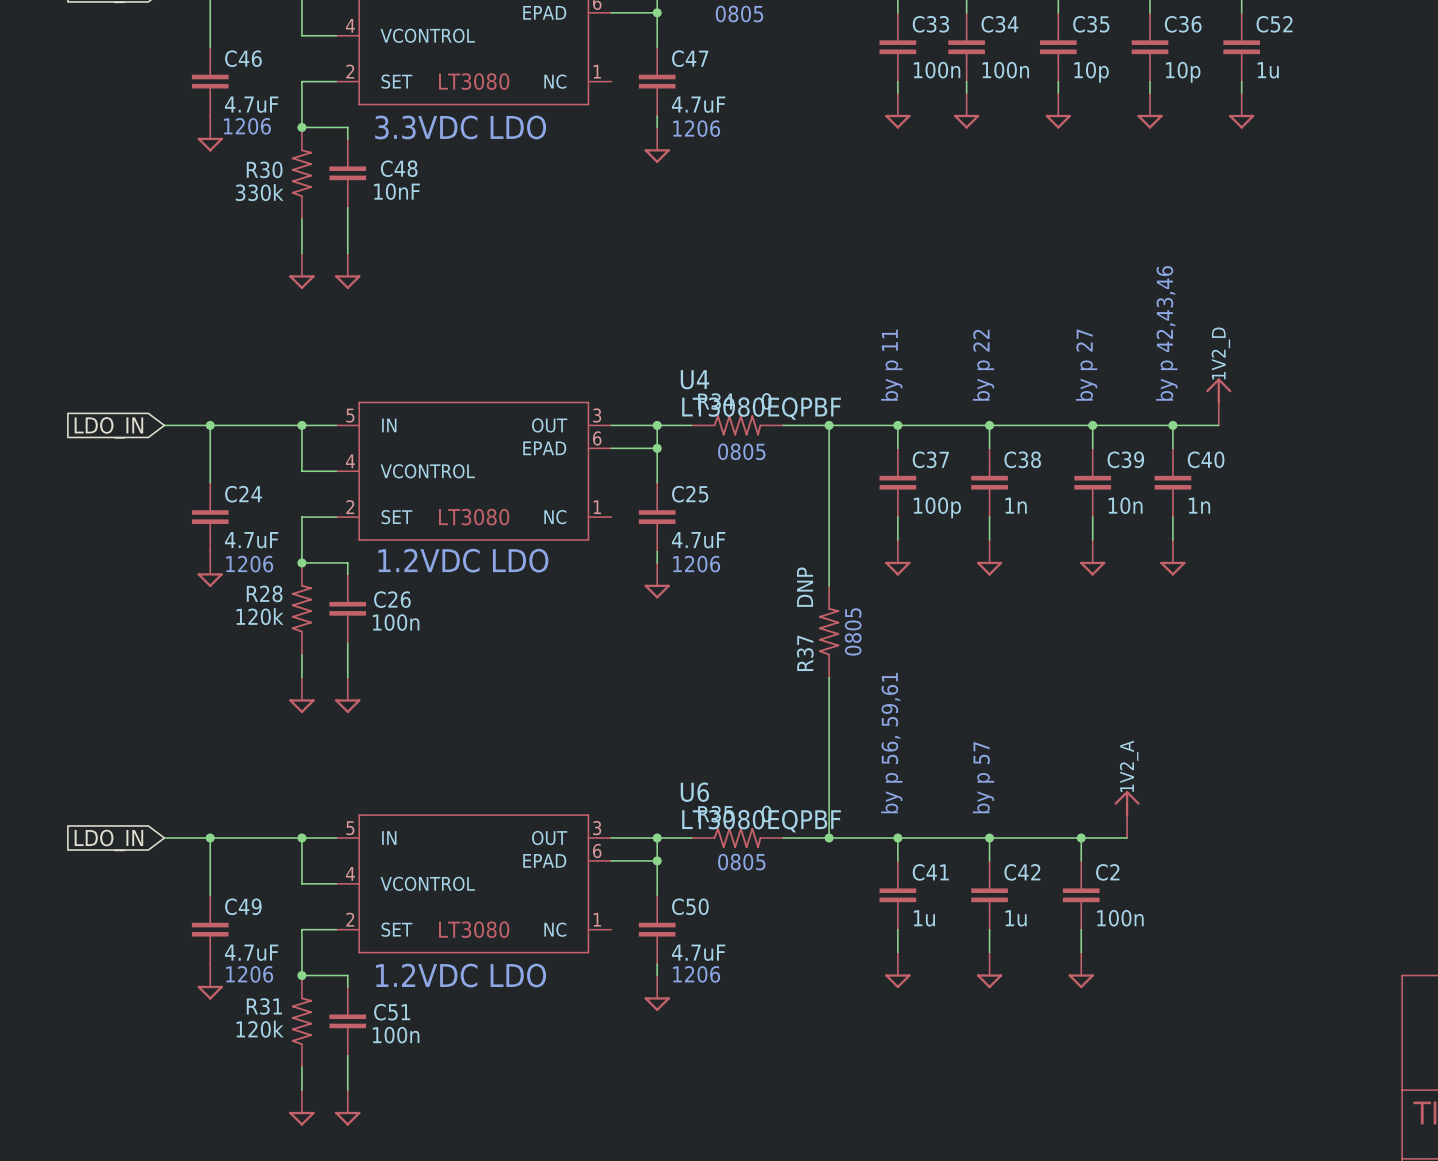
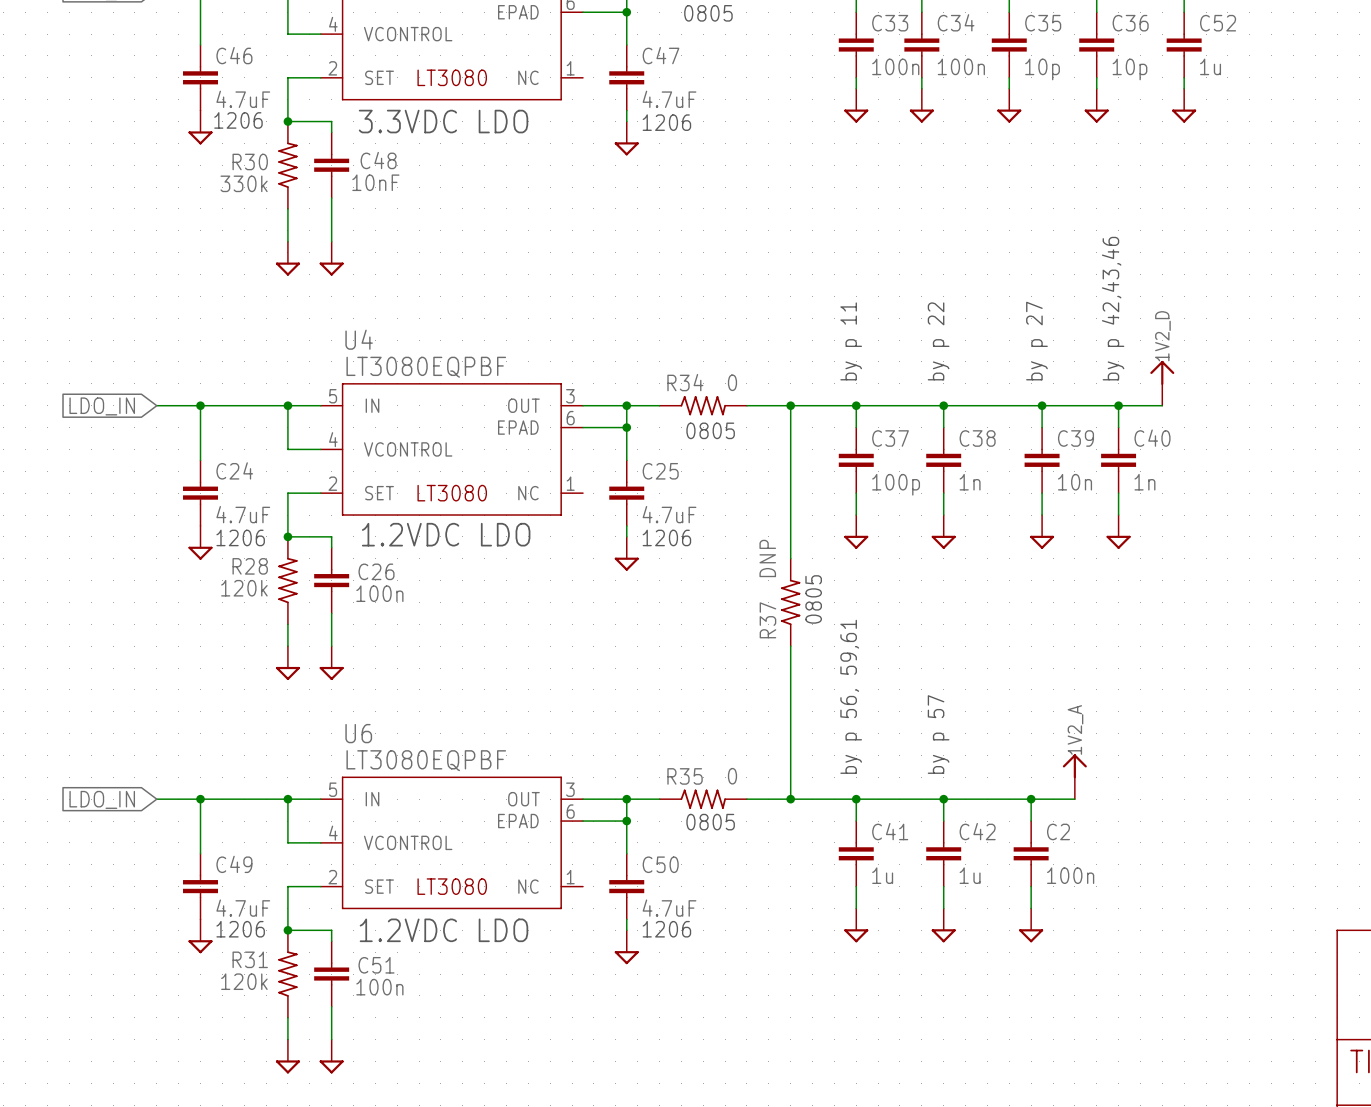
U4 name position: U4 (694, 379) -> U4 (359, 339)
U4 value position: LT3080EQPBF (761, 408) -> LT3080EQPBF (426, 367)
U6 name position: U6 (694, 792) -> U6 (358, 733)
U6 value position: LT3080EQPBF (761, 821) -> LT3080EQPBF (426, 760)

